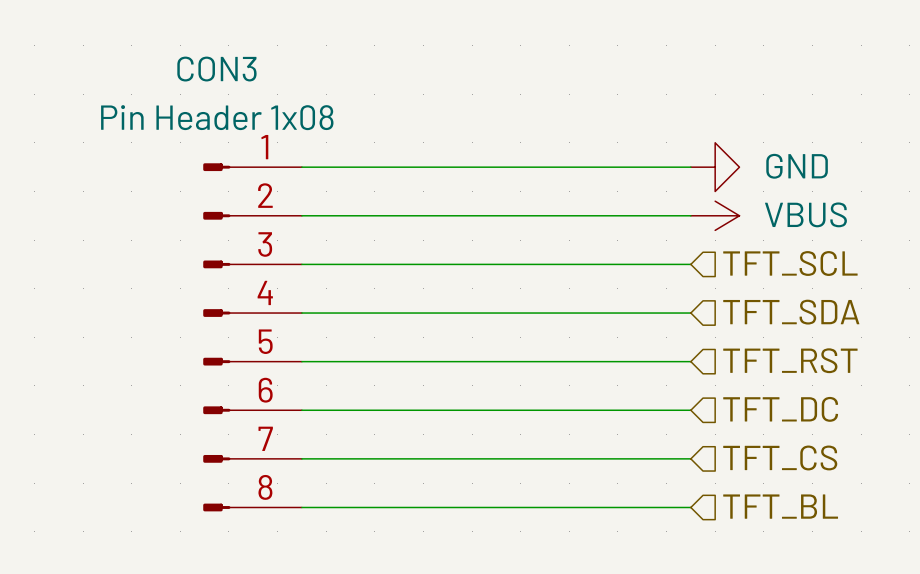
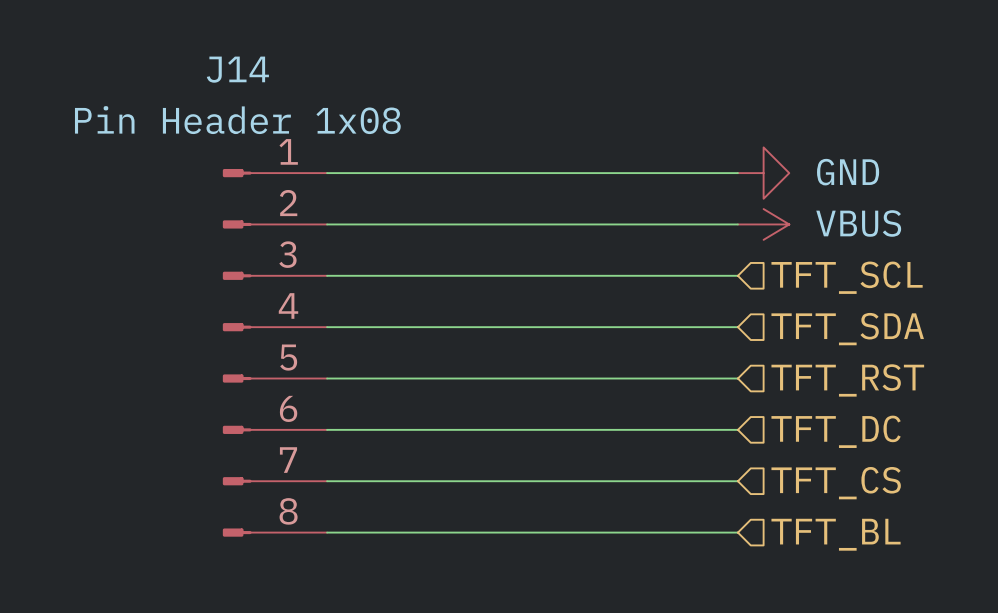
CON3 name: CON3 (216, 69) -> J14 (237, 69)

